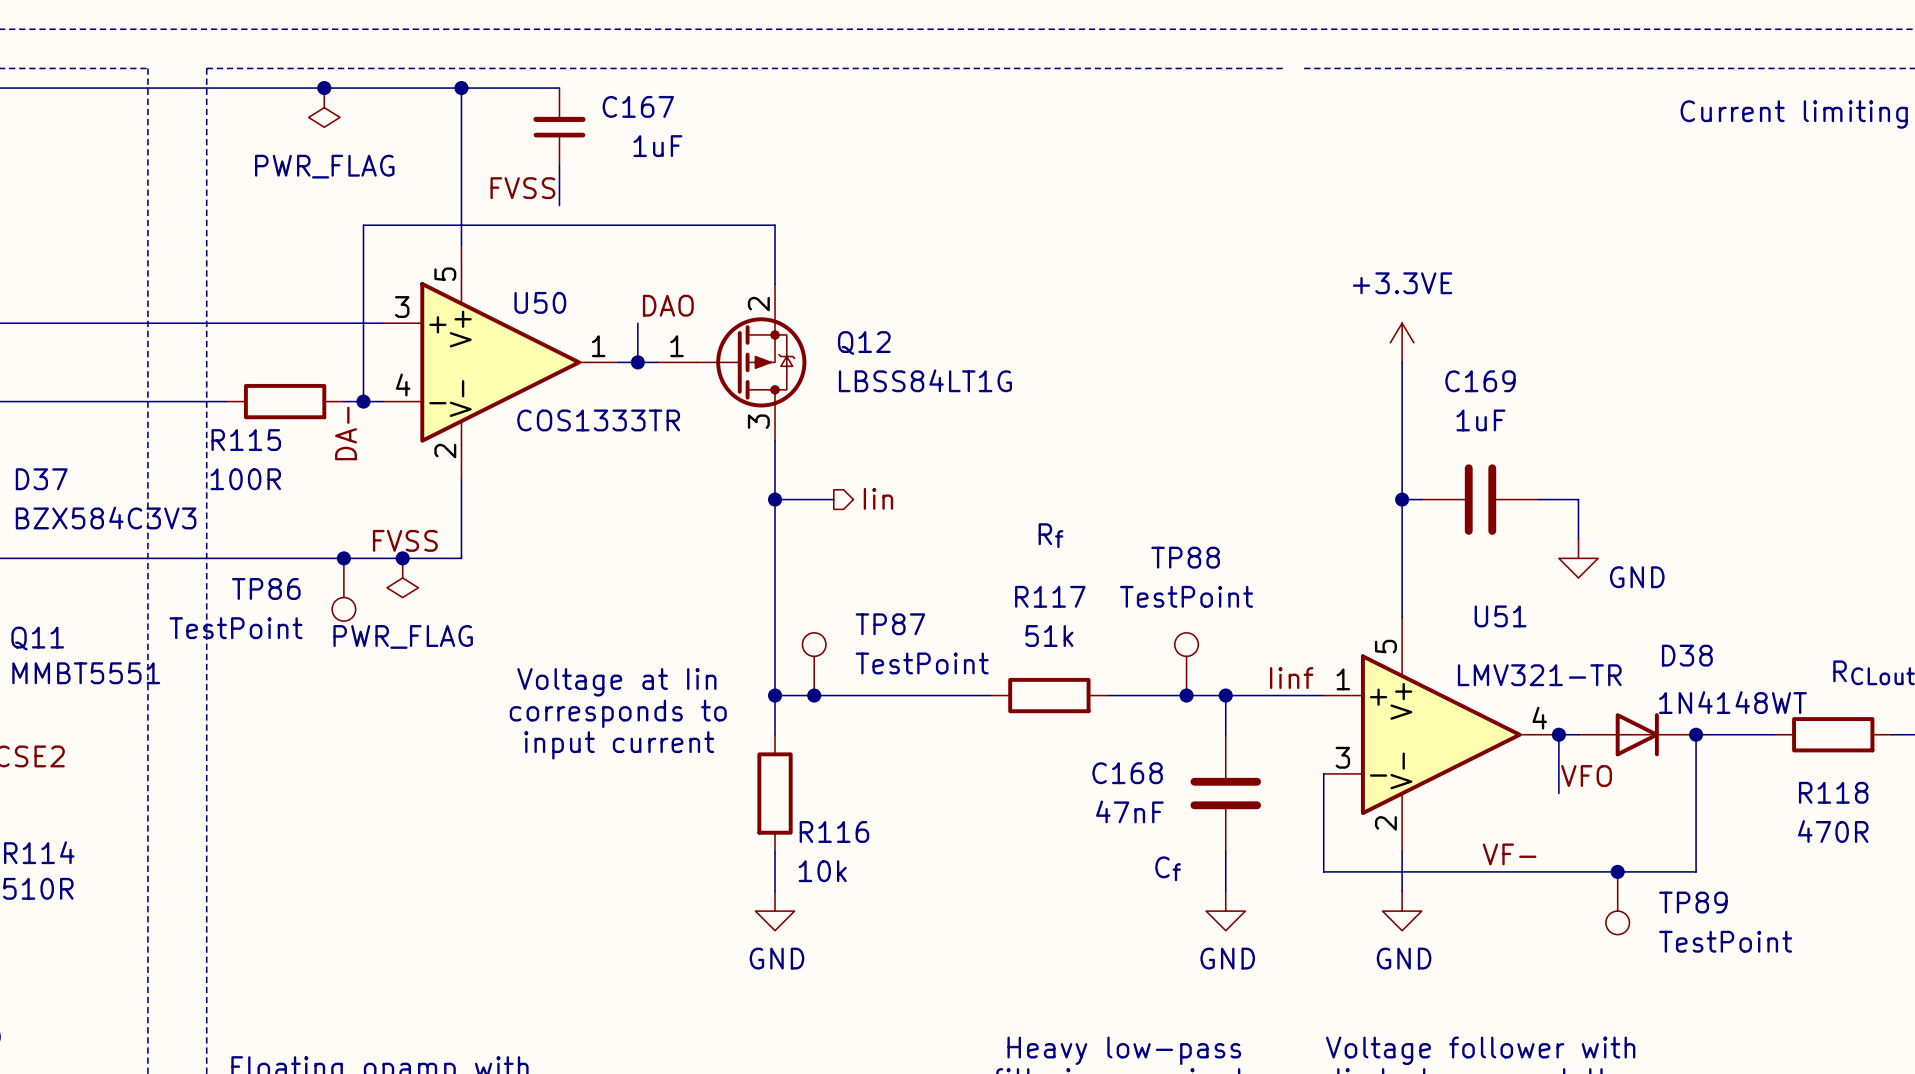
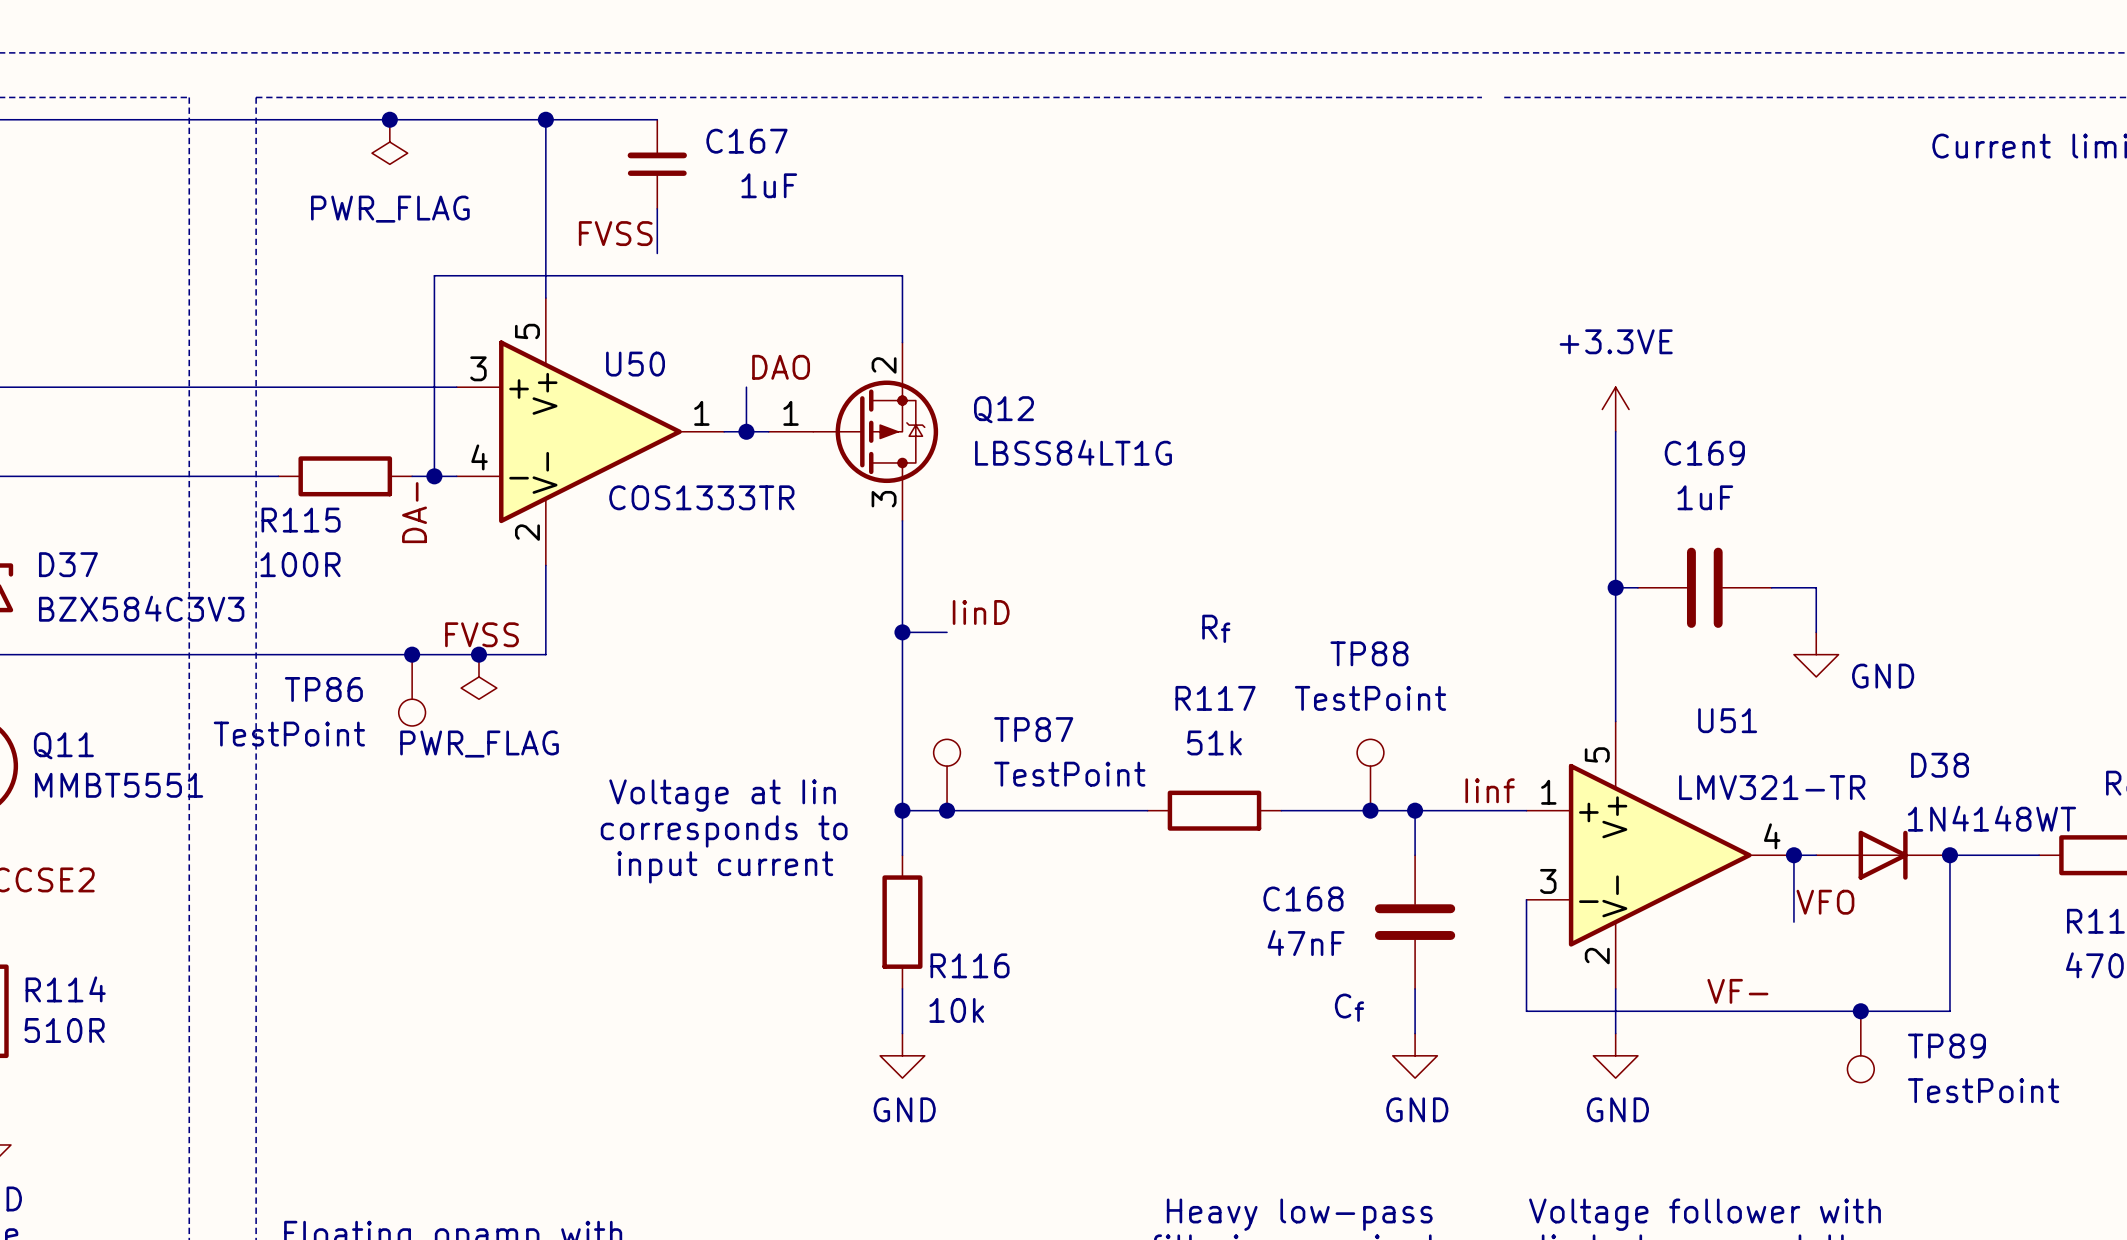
hierarchical label: Iin (878, 498) -> none
wire: (775, 499) (833, 499) -> none
junction position: (775, 499) -> (902, 632)
label: none -> IinD (981, 612)
wire: none -> (902, 632) (947, 632)

